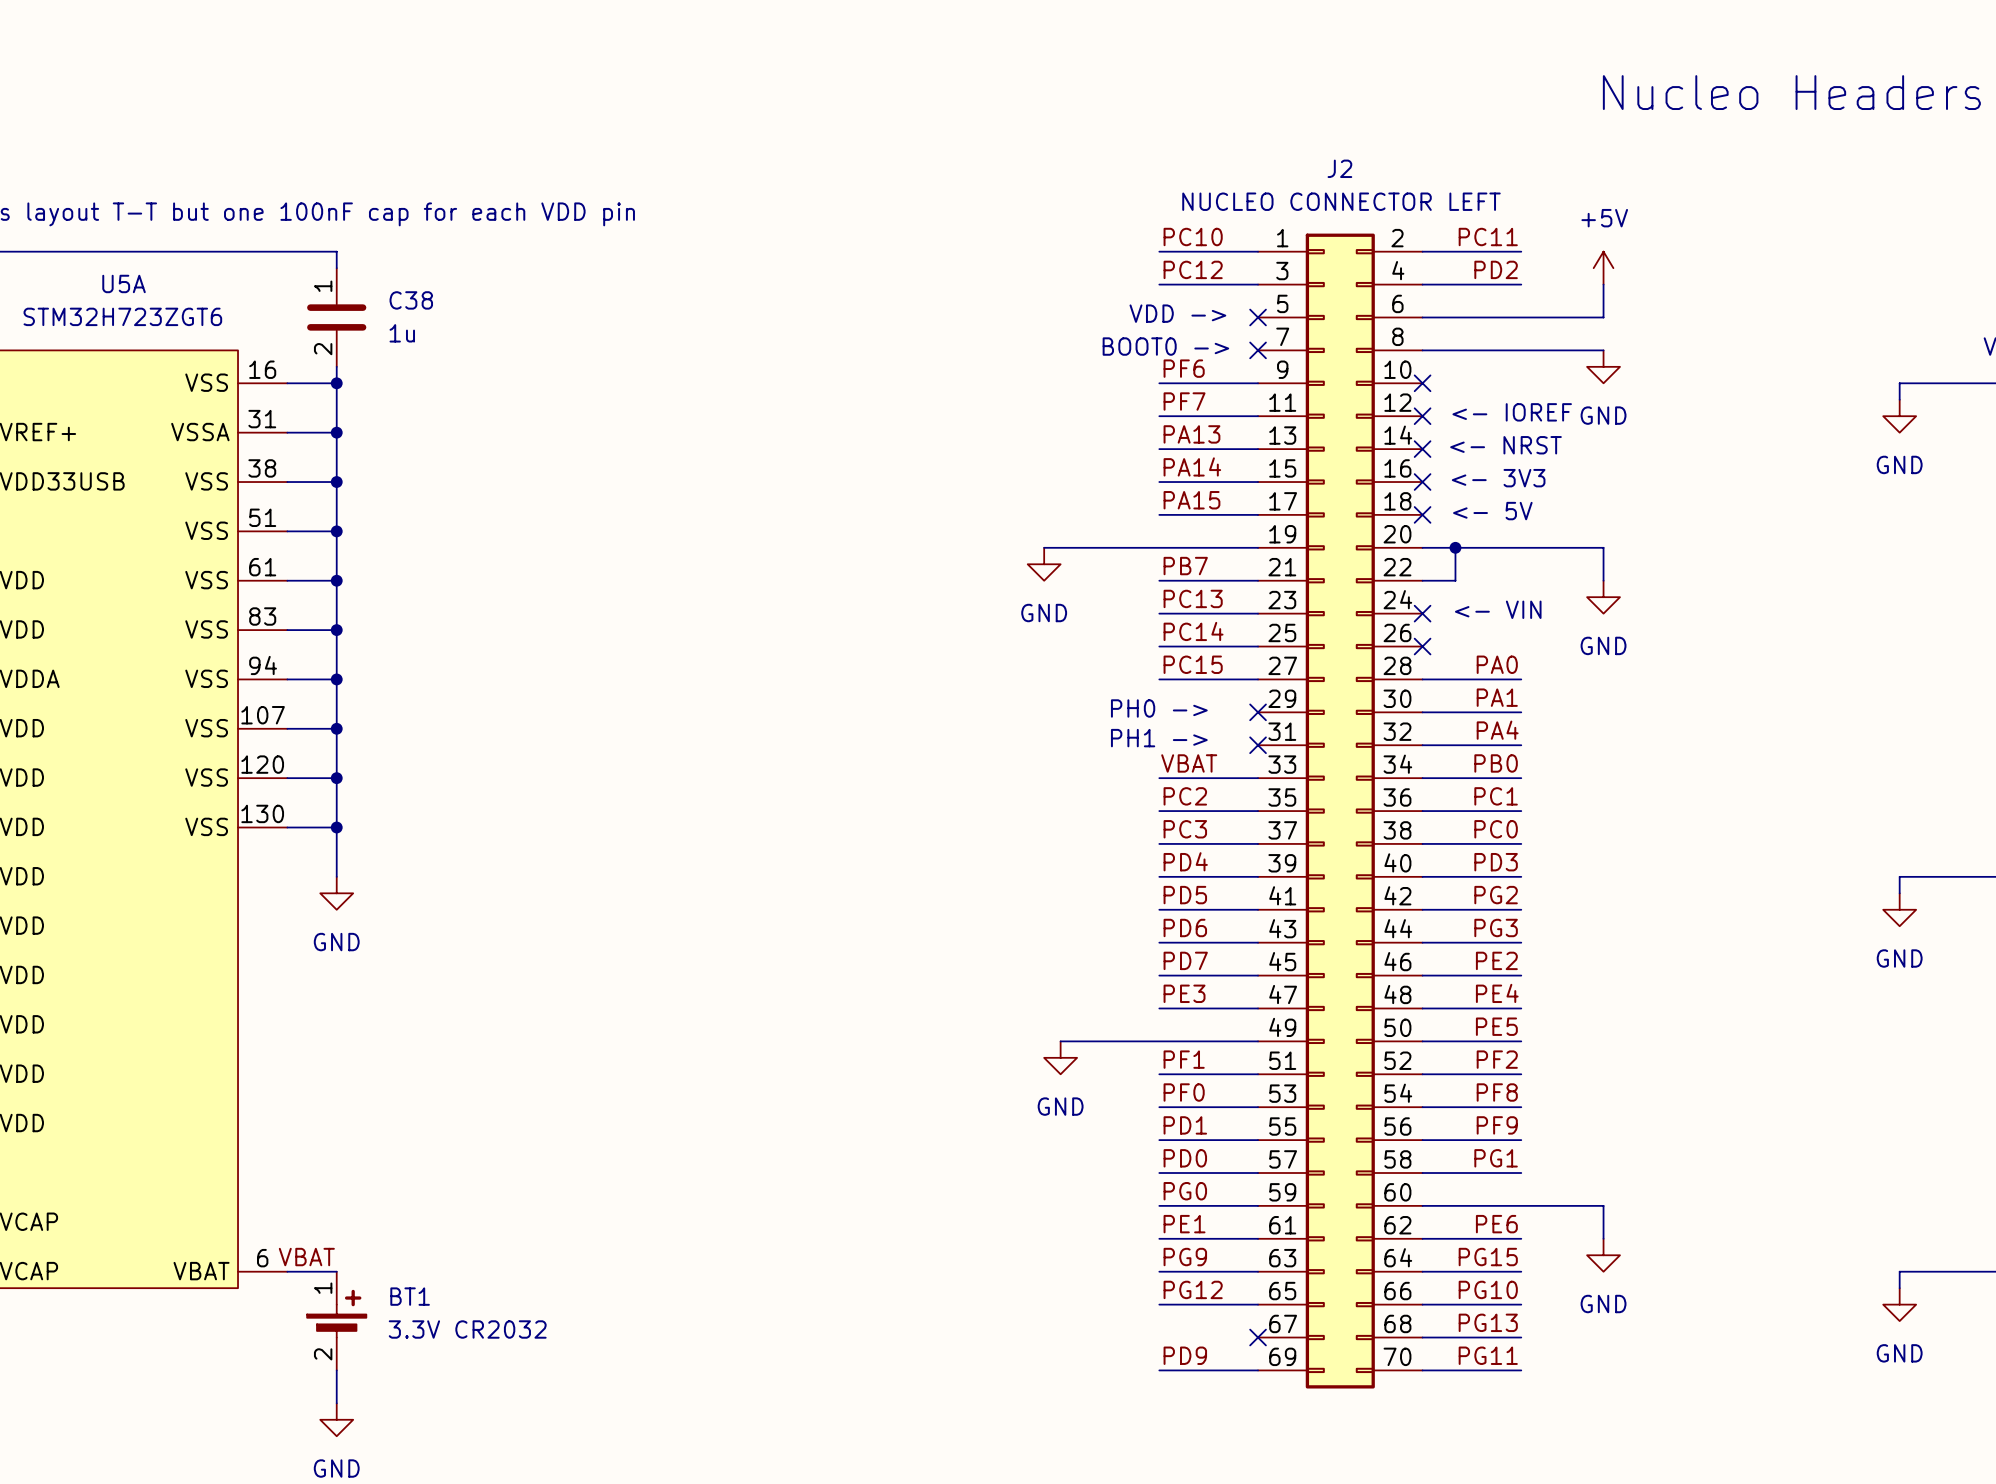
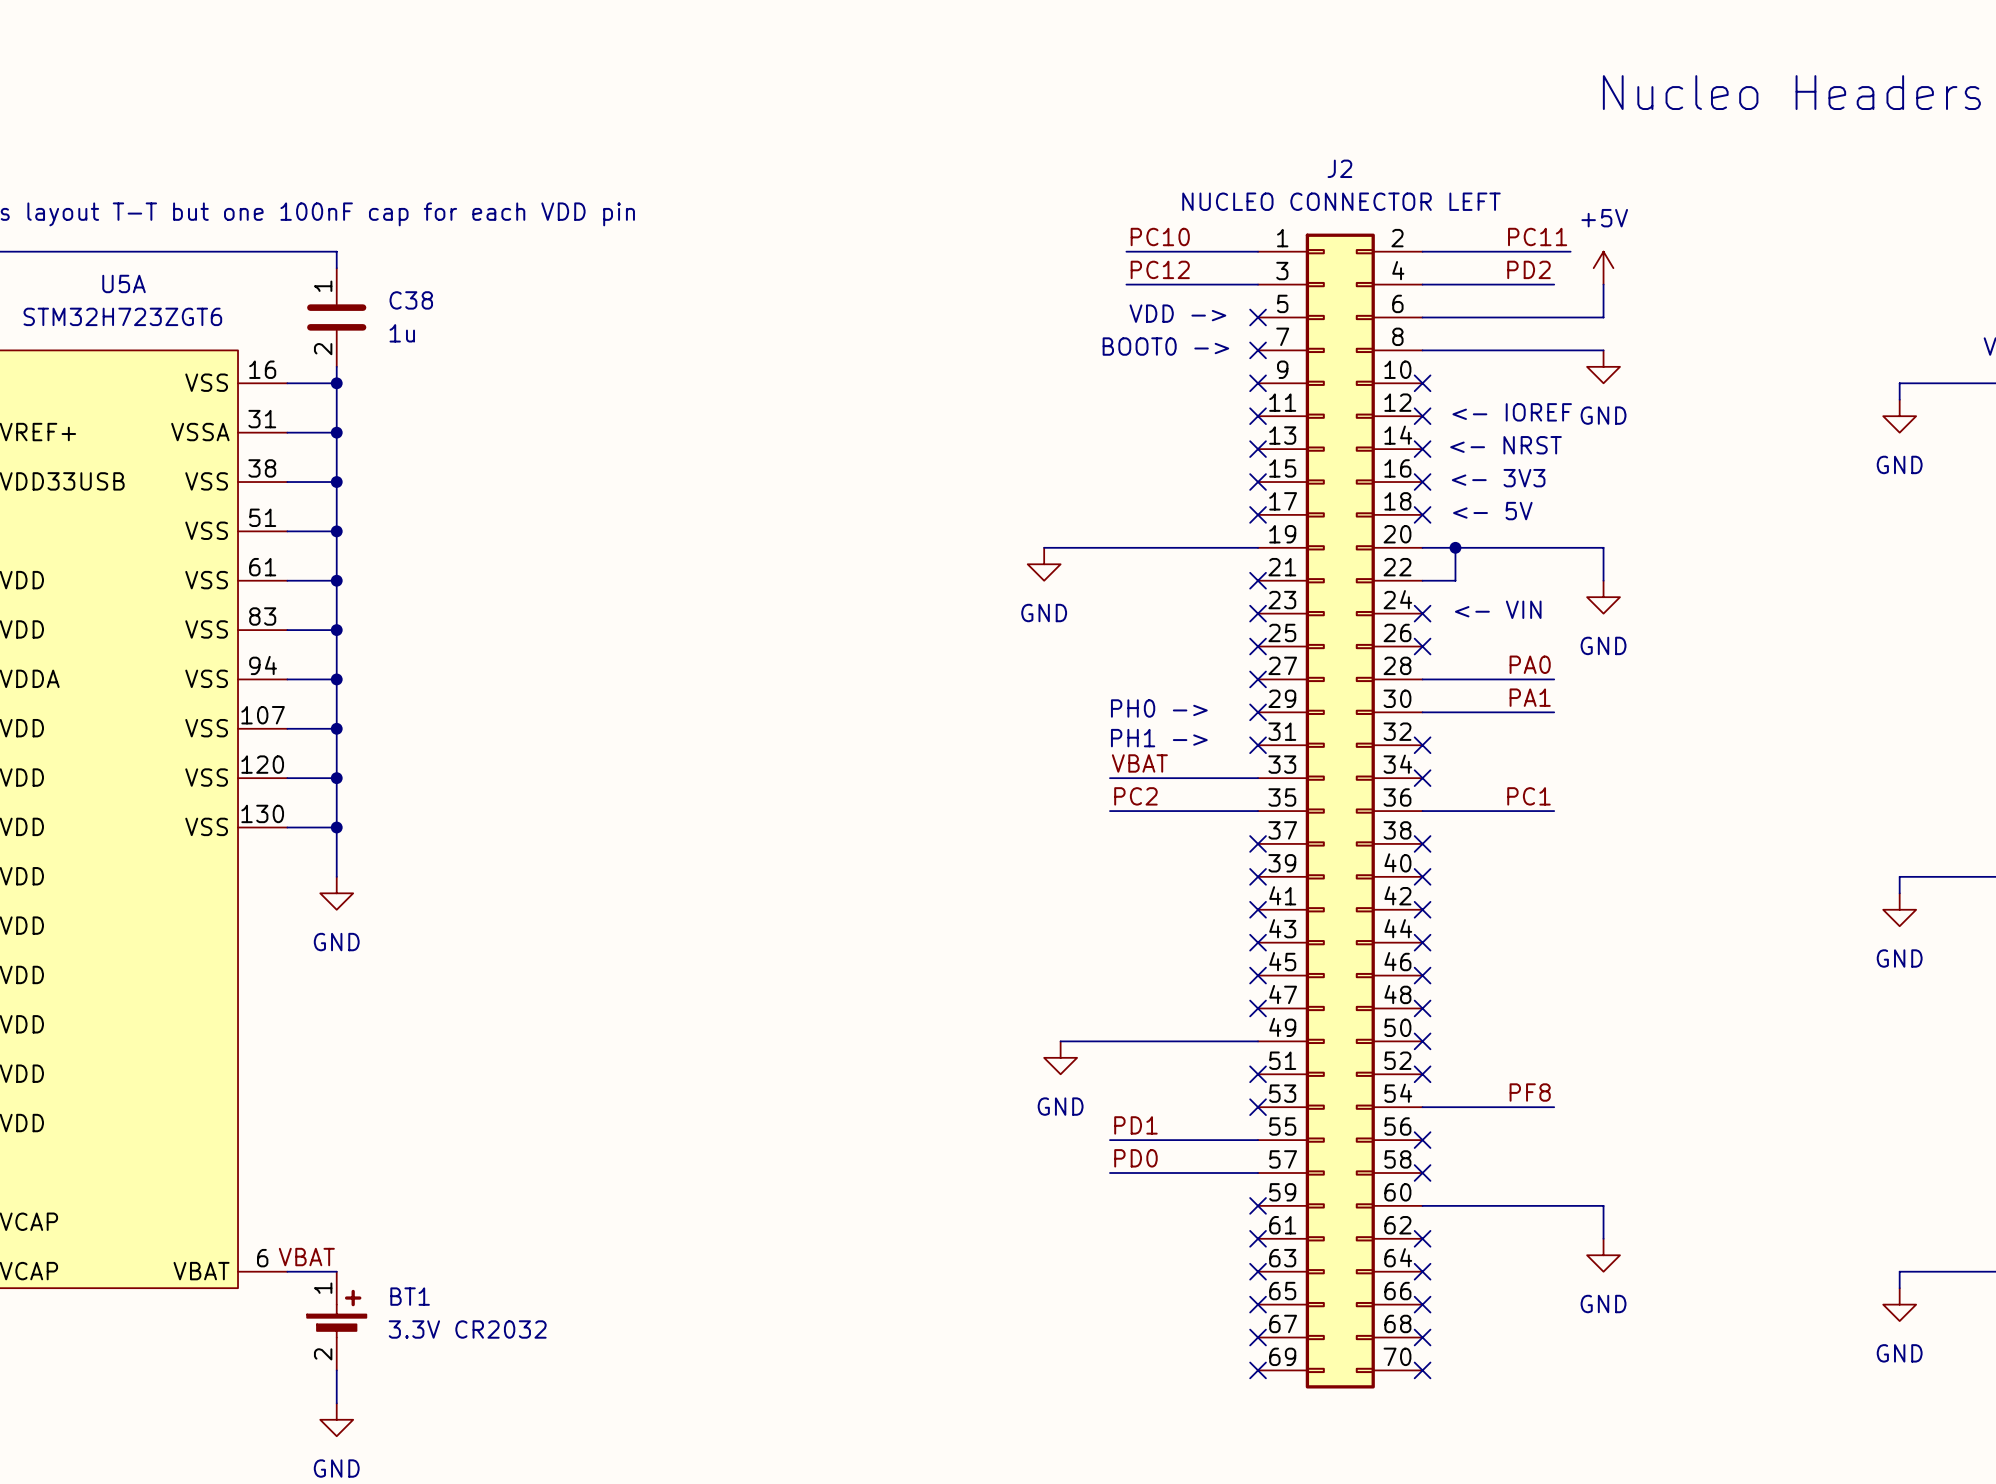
label position: PC10 (1193, 237) -> PC10 (1160, 237)
label position: PC11 (1488, 237) -> PC11 (1537, 237)
wire: none -> (1126, 251) (1159, 251)
wire: none -> (1521, 251) (1570, 251)
label position: PC12 (1193, 269) -> PC12 (1160, 269)
label position: PD2 (1496, 269) -> PD2 (1528, 269)
wire: none -> (1126, 284) (1159, 284)
wire: none -> (1521, 284) (1554, 284)
label: PF6 (1184, 368) -> none
wire: (1159, 383) (1258, 383) -> none
no-connect mark: none -> (1258, 383)
label: PF7 (1184, 401) -> none
wire: (1159, 416) (1258, 416) -> none
no-connect mark: none -> (1258, 416)
label: PA13 (1191, 434) -> none
wire: (1159, 449) (1258, 449) -> none
no-connect mark: none -> (1258, 449)
label: PA14 (1192, 466) -> none
wire: (1159, 482) (1258, 482) -> none
no-connect mark: none -> (1258, 482)
label: PA15 (1191, 500) -> none
wire: (1159, 514) (1258, 514) -> none
no-connect mark: none -> (1258, 514)
label: PB7 (1185, 566) -> none
wire: (1159, 580) (1258, 580) -> none
no-connect mark: none -> (1258, 580)
label: PC13 (1193, 598) -> none
wire: (1159, 613) (1258, 613) -> none
no-connect mark: none -> (1258, 613)
label: PC14 (1193, 631) -> none
wire: (1159, 646) (1258, 646) -> none
no-connect mark: none -> (1258, 646)
label: PC15 (1193, 664) -> none
label position: PA0 (1497, 664) -> PA0 (1530, 664)
wire: (1159, 679) (1258, 679) -> none
no-connect mark: none -> (1258, 679)
wire: none -> (1521, 679) (1554, 679)
label position: PA1 (1497, 697) -> PA1 (1530, 697)
wire: none -> (1521, 712) (1554, 712)
label: PA4 (1497, 730) -> none
wire: (1422, 745) (1521, 745) -> none
no-connect mark: none -> (1422, 745)
label position: VBAT (1189, 763) -> VBAT (1139, 763)
label: PB0 (1496, 763) -> none
wire: none -> (1109, 778) (1159, 778)
wire: (1422, 778) (1521, 778) -> none
no-connect mark: none -> (1422, 778)
label position: PC2 (1185, 796) -> PC2 (1135, 796)
label position: PC1 (1496, 796) -> PC1 (1528, 796)
wire: none -> (1109, 811) (1159, 811)
wire: none -> (1521, 811) (1554, 811)
label: PC3 (1185, 829) -> none
label: PC0 (1496, 829) -> none
wire: (1159, 843) (1258, 843) -> none
no-connect mark: none -> (1258, 843)
wire: (1422, 843) (1521, 843) -> none
no-connect mark: none -> (1422, 843)
label: PD4 (1185, 861) -> none
label: PD3 (1496, 862) -> none
wire: (1159, 876) (1258, 876) -> none
no-connect mark: none -> (1258, 876)
wire: (1422, 876) (1521, 876) -> none
no-connect mark: none -> (1422, 876)
label: PD5 (1185, 895) -> none
label: PG2 (1496, 895) -> none
wire: (1159, 909) (1258, 909) -> none
no-connect mark: none -> (1258, 909)
wire: (1422, 909) (1521, 909) -> none
no-connect mark: none -> (1422, 909)
label: PD6 (1185, 927) -> none
label: PG3 (1496, 927) -> none
wire: (1159, 942) (1258, 942) -> none
no-connect mark: none -> (1258, 942)
wire: (1422, 942) (1521, 942) -> none
no-connect mark: none -> (1422, 942)
label: PD7 (1185, 960) -> none
label: PE2 (1496, 960) -> none
wire: (1159, 975) (1258, 975) -> none
no-connect mark: none -> (1258, 975)
wire: (1422, 975) (1521, 975) -> none
no-connect mark: none -> (1422, 975)
label: PE3 (1184, 993) -> none
label: PE4 (1497, 993) -> none
wire: (1159, 1008) (1258, 1008) -> none
no-connect mark: none -> (1258, 1008)
wire: (1422, 1008) (1521, 1008) -> none
no-connect mark: none -> (1422, 1008)
label: PE5 (1496, 1026) -> none
wire: (1422, 1041) (1521, 1041) -> none
no-connect mark: none -> (1422, 1041)
label: PF1 (1184, 1059) -> none
label: PF2 (1497, 1059) -> none
wire: (1159, 1074) (1258, 1074) -> none
no-connect mark: none -> (1258, 1074)
wire: (1422, 1074) (1521, 1074) -> none
no-connect mark: none -> (1422, 1074)
label: PF0 (1184, 1092) -> none
label position: PF8 (1497, 1092) -> PF8 (1530, 1092)
wire: (1159, 1107) (1258, 1107) -> none
no-connect mark: none -> (1258, 1107)
wire: none -> (1521, 1107) (1554, 1107)
label position: PD1 (1185, 1125) -> PD1 (1135, 1125)
label: PF9 (1497, 1125) -> none
wire: none -> (1109, 1140) (1159, 1140)
wire: (1422, 1140) (1521, 1140) -> none
no-connect mark: none -> (1422, 1140)
label position: PD0 (1185, 1158) -> PD0 (1135, 1158)
label: PG1 (1496, 1158) -> none
wire: none -> (1109, 1173) (1159, 1173)
wire: (1422, 1173) (1521, 1173) -> none
no-connect mark: none -> (1422, 1173)
label: PG0 (1185, 1191) -> none
wire: (1159, 1205) (1258, 1205) -> none
no-connect mark: none -> (1258, 1205)
label: PE1 (1184, 1224) -> none
label: PE6 (1496, 1224) -> none
wire: (1159, 1238) (1258, 1238) -> none
no-connect mark: none -> (1258, 1238)
wire: (1422, 1238) (1521, 1238) -> none
no-connect mark: none -> (1422, 1238)
label: PG9 (1185, 1257) -> none
label: PG15 (1488, 1257) -> none
wire: (1159, 1271) (1258, 1271) -> none
no-connect mark: none -> (1258, 1271)
wire: (1422, 1271) (1521, 1271) -> none
no-connect mark: none -> (1422, 1271)
label: PG12 (1193, 1289) -> none
label: PG10 (1488, 1289) -> none
wire: (1159, 1304) (1258, 1304) -> none
no-connect mark: none -> (1258, 1304)
wire: (1422, 1304) (1521, 1304) -> none
no-connect mark: none -> (1422, 1304)
label: PG13 (1488, 1322) -> none
wire: (1422, 1337) (1521, 1337) -> none
no-connect mark: none -> (1422, 1337)
label: PD9 (1185, 1355) -> none
label: PG11 (1488, 1355) -> none
wire: (1159, 1370) (1258, 1370) -> none
no-connect mark: none -> (1258, 1370)
wire: (1422, 1370) (1521, 1370) -> none
no-connect mark: none -> (1422, 1370)

